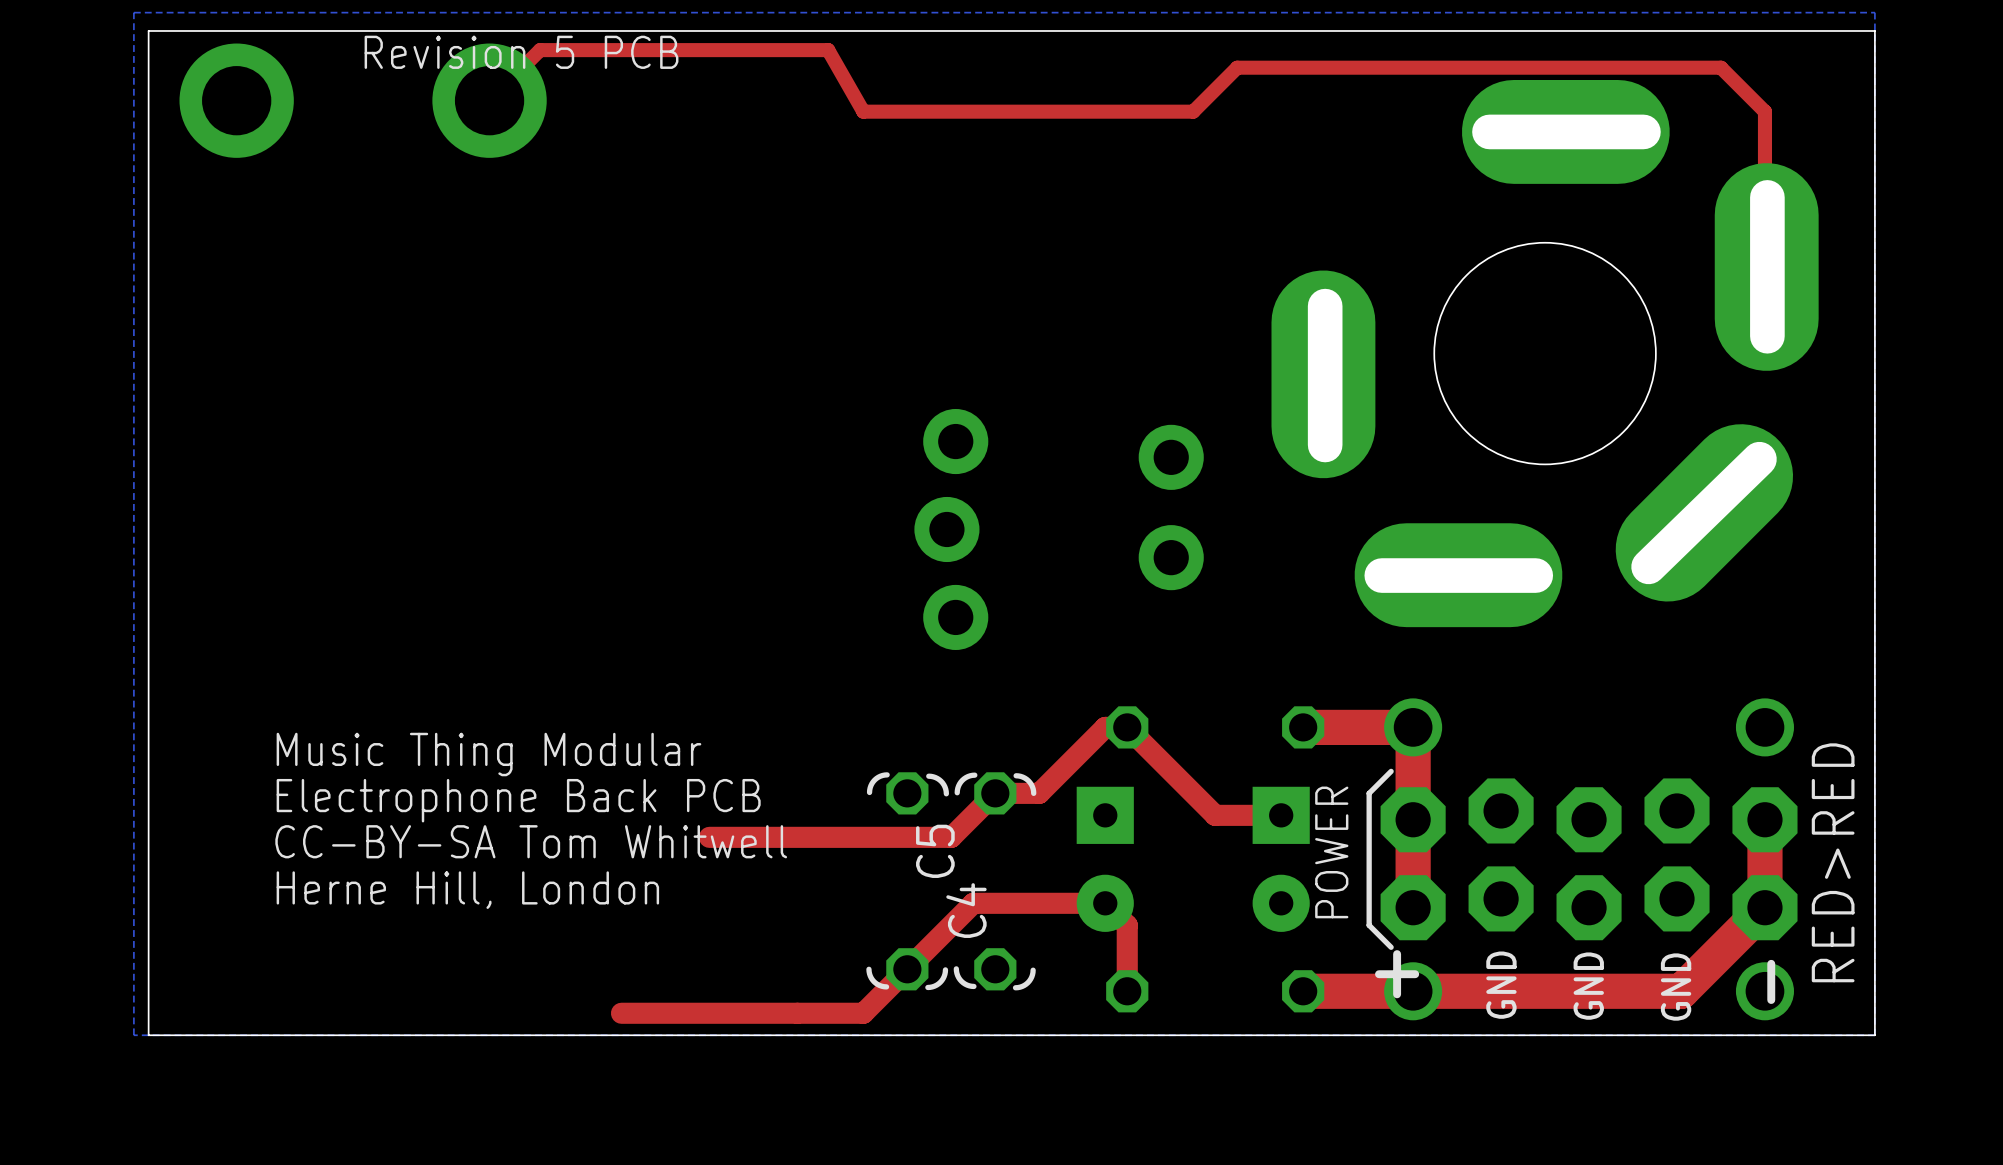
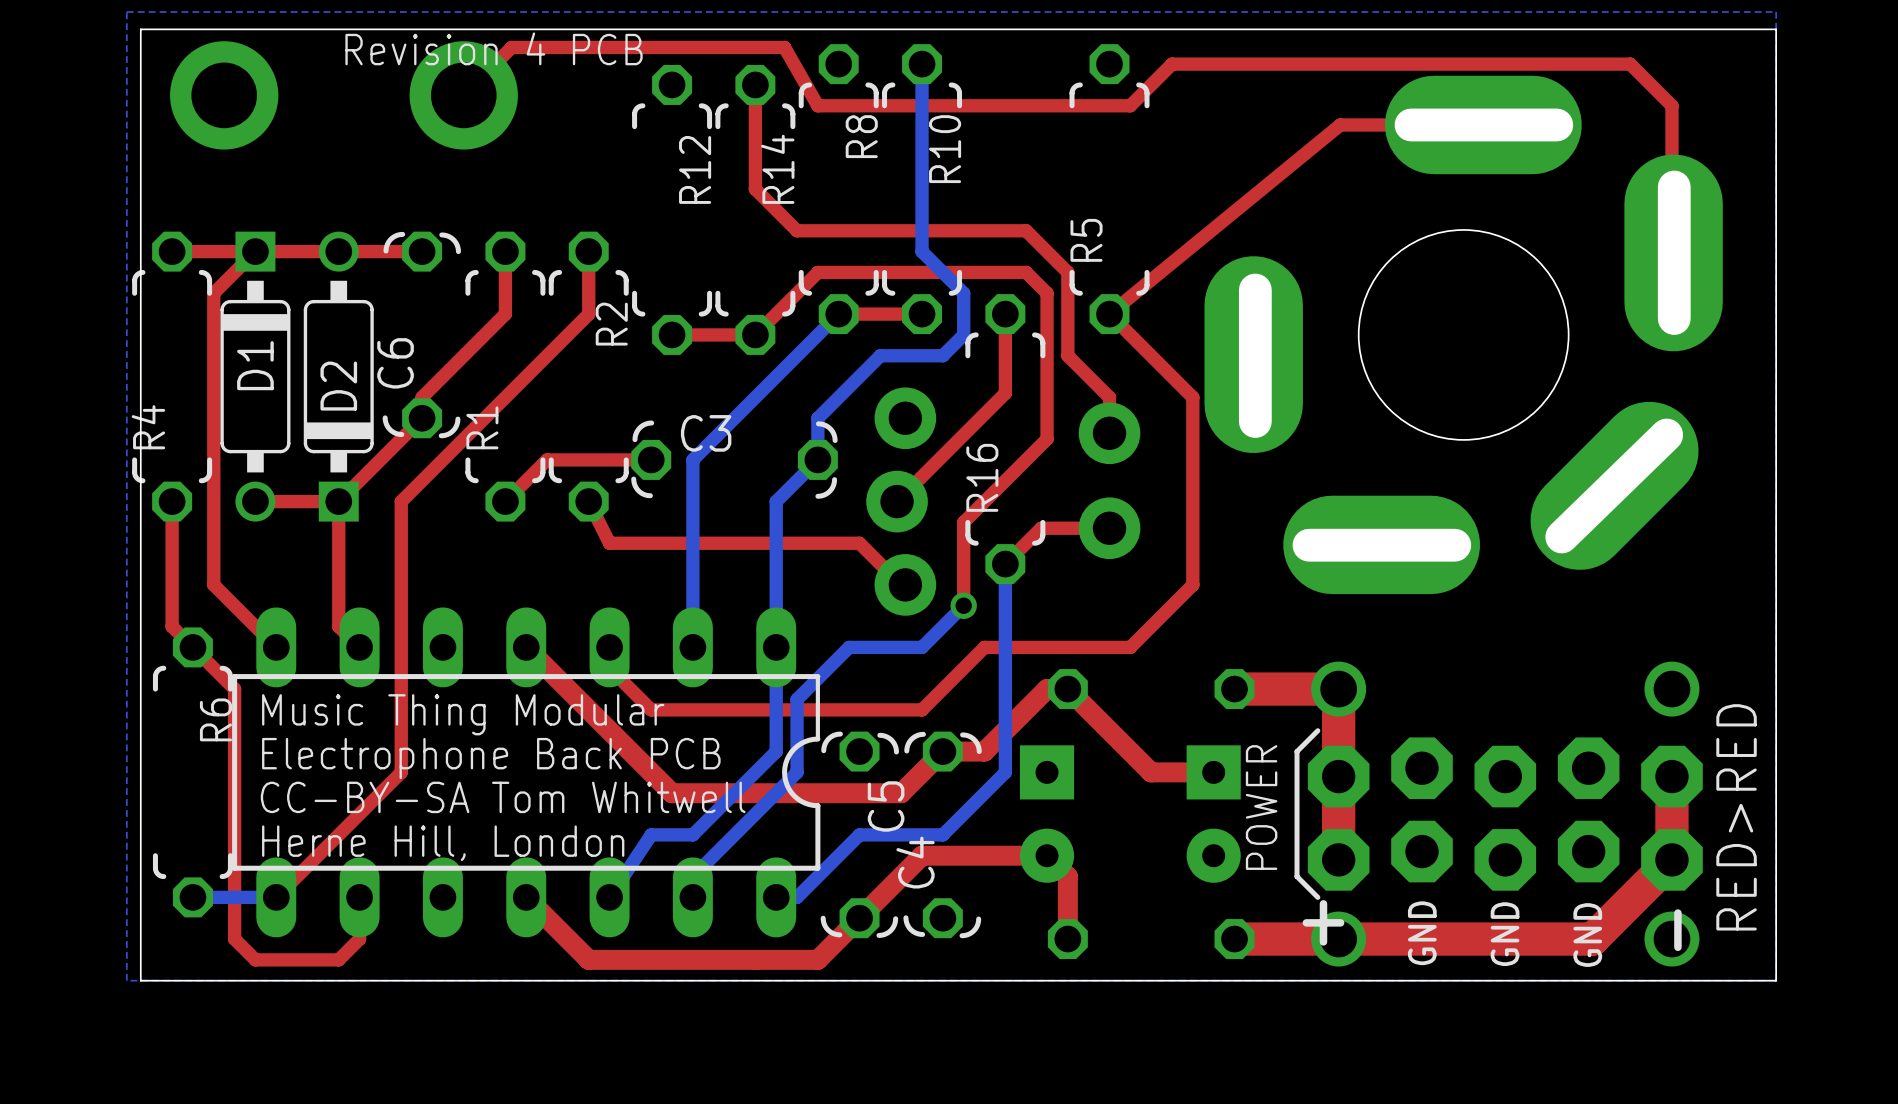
text: Revision 5 PCB (521, 52) -> Revision 4 PCB (494, 48)
bottom track: none -> (922, 64) (922, 251) (963, 293) (963, 334) (942, 355) (880, 355) (817, 418) (817, 459) (776, 501) (776, 751) (692, 834) (651, 834) (609, 897)
top track: none -> (755, 84) (755, 189) (797, 230) (1026, 230) (1067, 272) (1067, 355) (1109, 397) (1109, 433)
top track: none -> (1483, 124) (1340, 124) (1109, 314) (1192, 397) (1192, 584) (1130, 647) (984, 647) (922, 709) (651, 709) (609, 668) (609, 647)
R8: none -> (838, 189)
R10: none -> (922, 189)
R5: none -> (1109, 189)
R12: none -> (672, 209)
R14: none -> (755, 209)
top track: none -> (255, 251) (213, 293) (213, 584) (276, 647)
top track: none -> (422, 251) (172, 251)
top track: none -> (505, 251) (505, 314) (422, 397) (422, 418) (338, 501)
top track: none -> (588, 251) (588, 314) (401, 501) (401, 772) (276, 897)
bottom track: none -> (838, 314) (692, 459) (692, 647)
top track: none -> (922, 314) (838, 314)
top track: none -> (1005, 314) (1005, 393) (897, 501)
C6: none -> (421, 334)
top track: none -> (672, 334) (755, 334) (817, 272) (1026, 272) (1047, 293) (1047, 439) (963, 522) (963, 605)
R4: none -> (172, 376)
D1: none -> (255, 376)
D2: none -> (338, 376)
R1: none -> (505, 376)
R2: none -> (588, 376)
R16: none -> (1005, 439)
top track: none -> (651, 459) (547, 459) (505, 501)
C3: none -> (734, 459)
top track: none -> (172, 501) (172, 626) (234, 689) (234, 939) (255, 959) (338, 959) (359, 939) (359, 897)
top track: none -> (338, 501) (255, 501)
top track: none -> (338, 501) (338, 626) (359, 647)
top track: none -> (588, 501) (609, 543) (859, 543) (901, 584) (905, 584)
top track: none -> (1109, 528) (1041, 528) (1005, 564)
bottom track: none -> (1005, 564) (1005, 772) (942, 834) (859, 834) (797, 897) (776, 897)
bottom track: none -> (963, 605) (922, 647) (849, 647) (797, 699) (797, 772) (692, 876) (692, 897)
via: none -> (963, 605)
top track: none -> (526, 647) (672, 793)
R6: none -> (192, 772)
part: none -> (526, 772)
bottom track: none -> (276, 897) (192, 897)
top track: none -> (526, 897) (588, 959)

